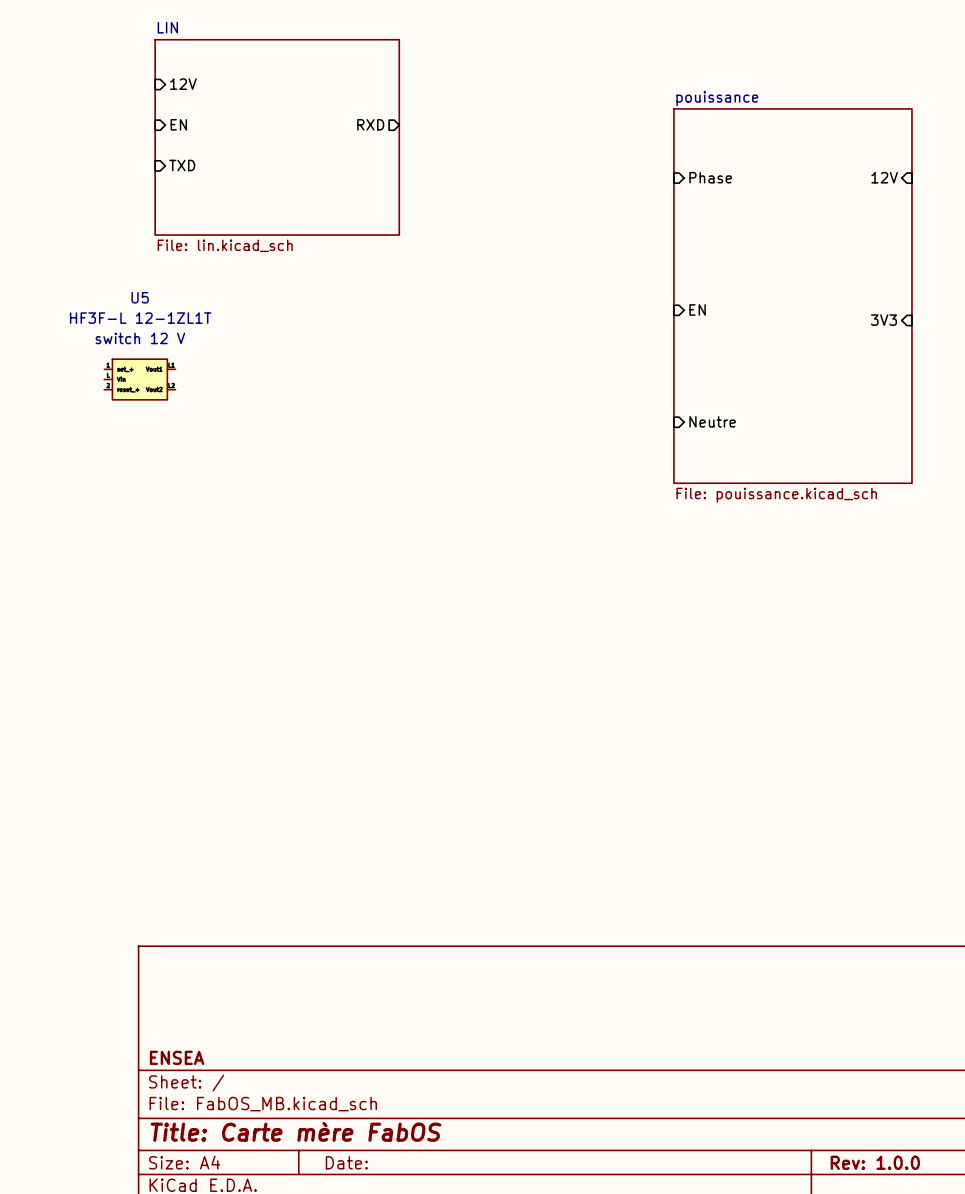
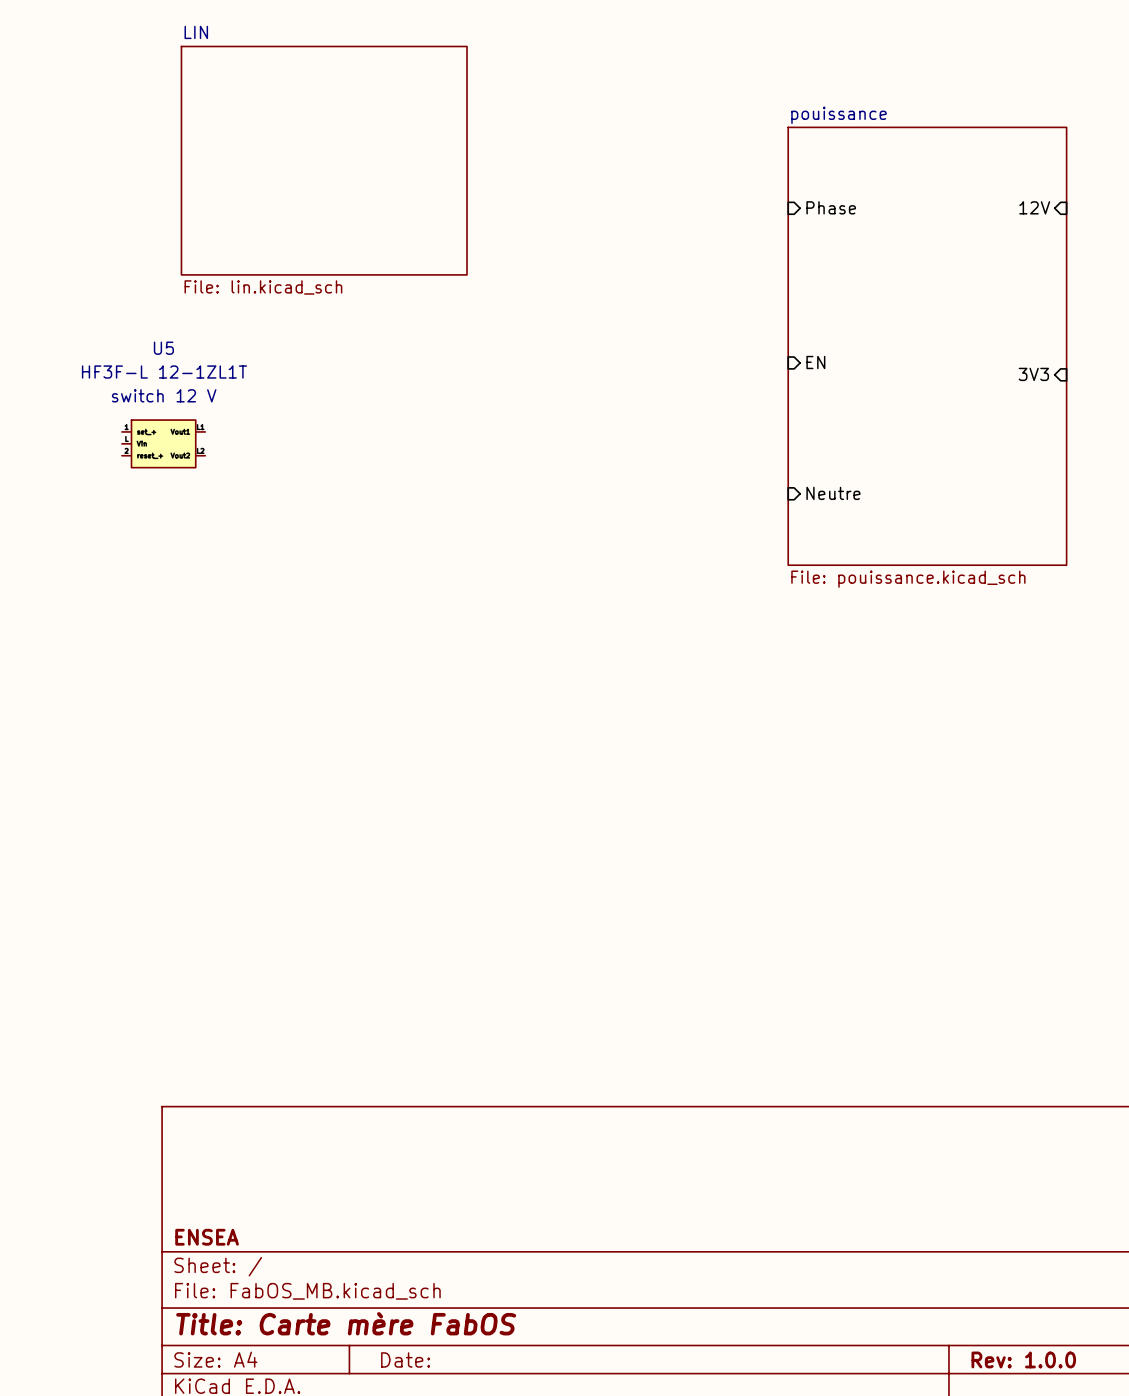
sheet pin: 12V (183, 84) -> none
sheet pin: EN (178, 124) -> none
sheet pin: RXD (370, 124) -> none
sheet pin: TXD (182, 165) -> none

